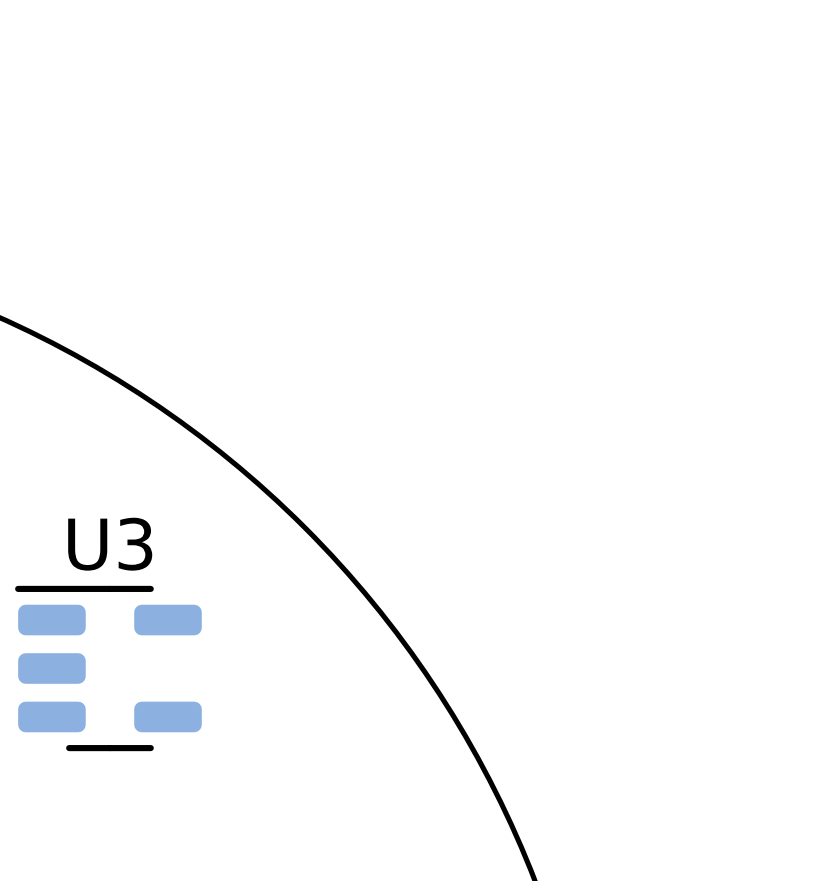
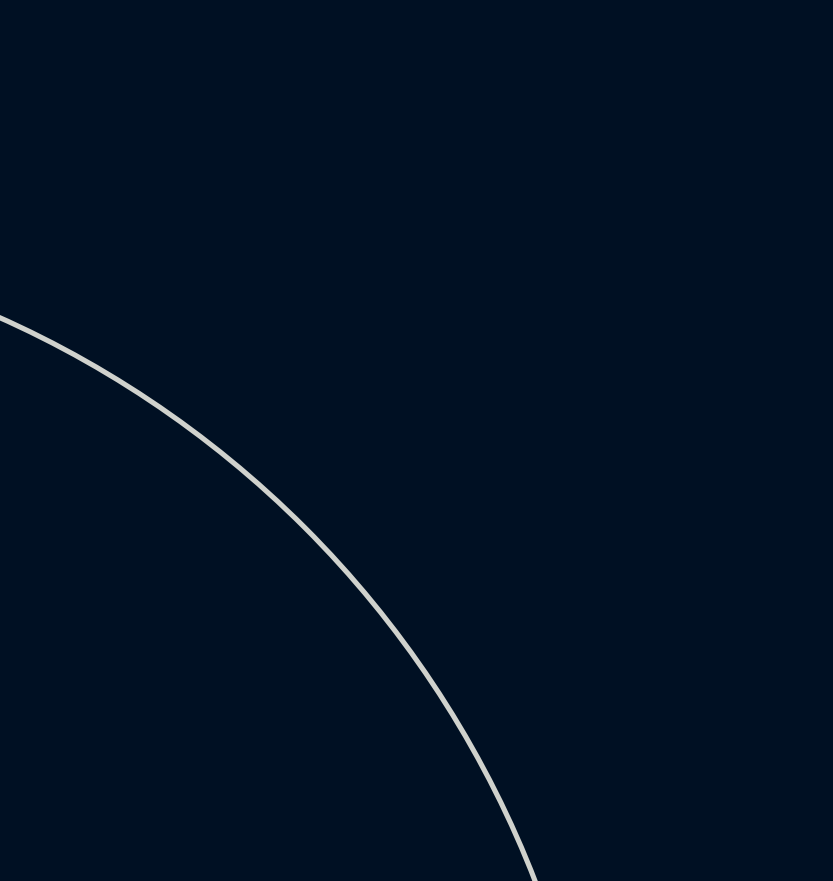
U3: (108, 668) -> none

